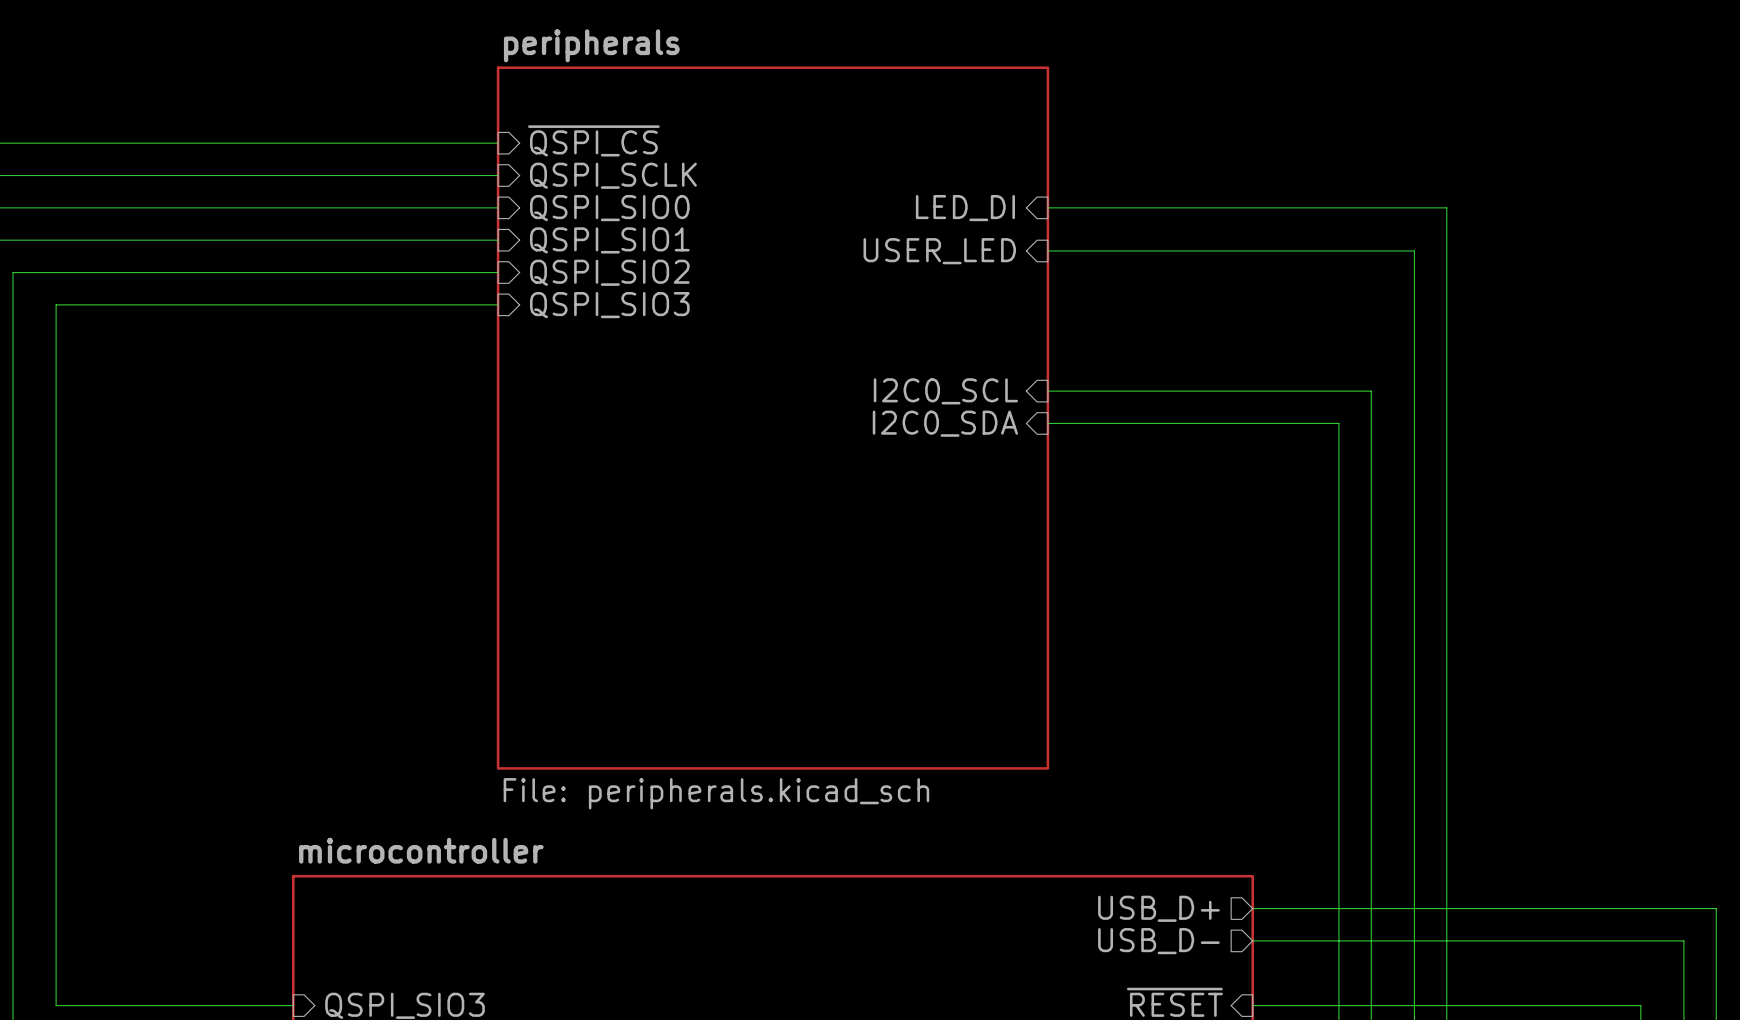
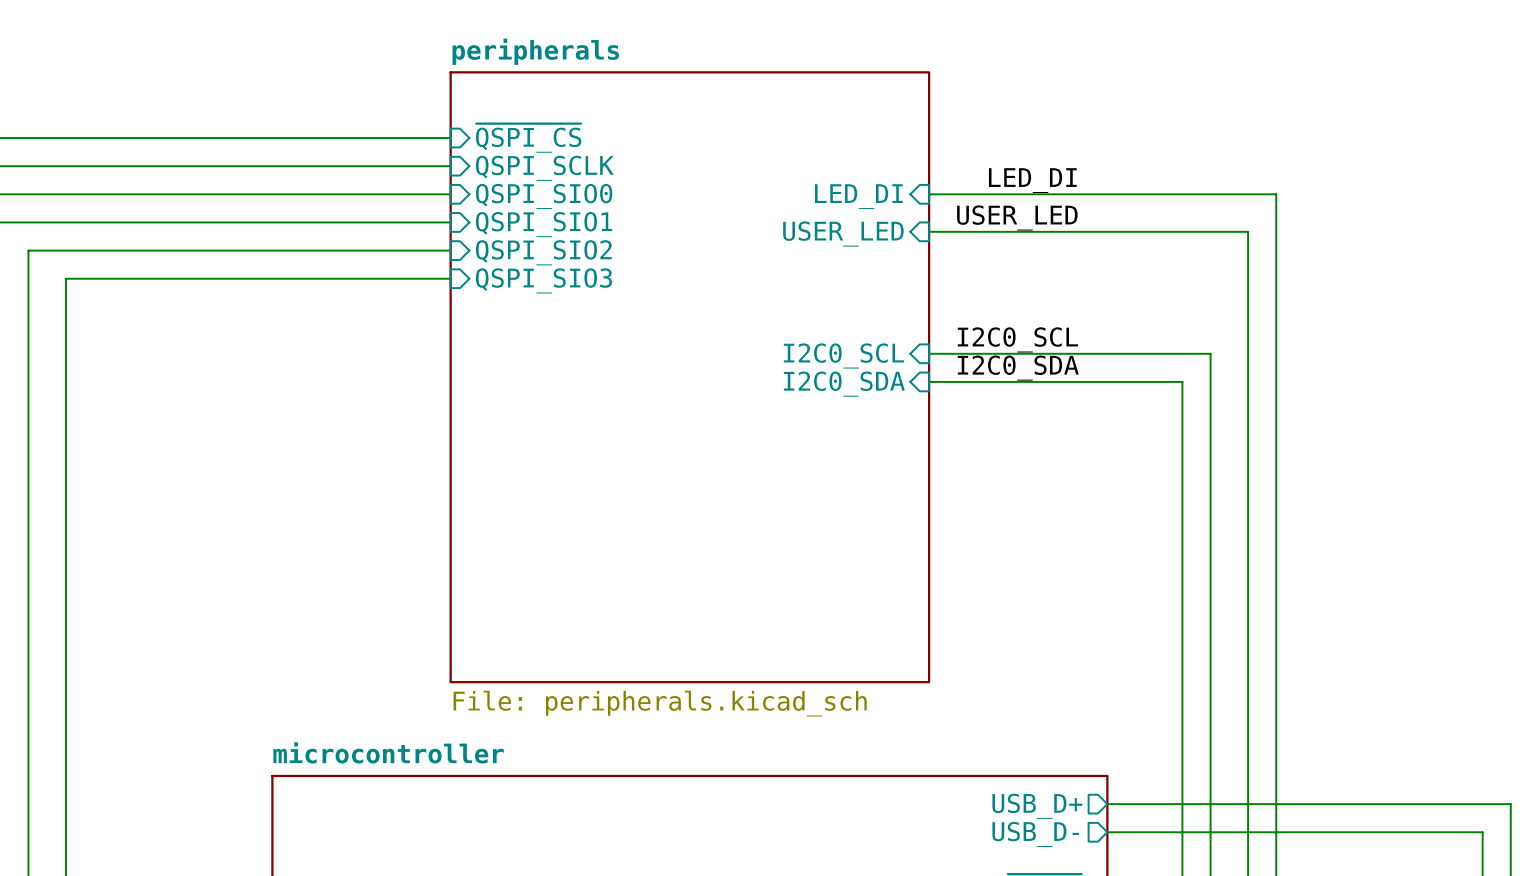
label: none -> LED_DI (1032, 180)
label: none -> USER_LED (1017, 217)
label: none -> I2C0_SCL (1017, 339)
label: none -> I2C0_SDA (1018, 368)

